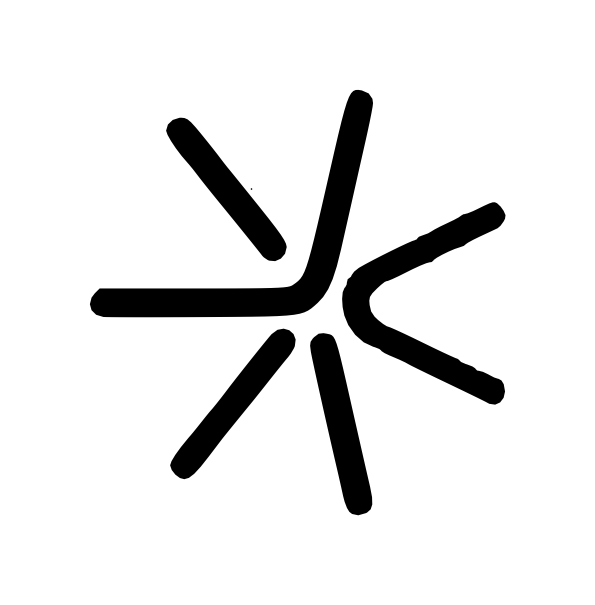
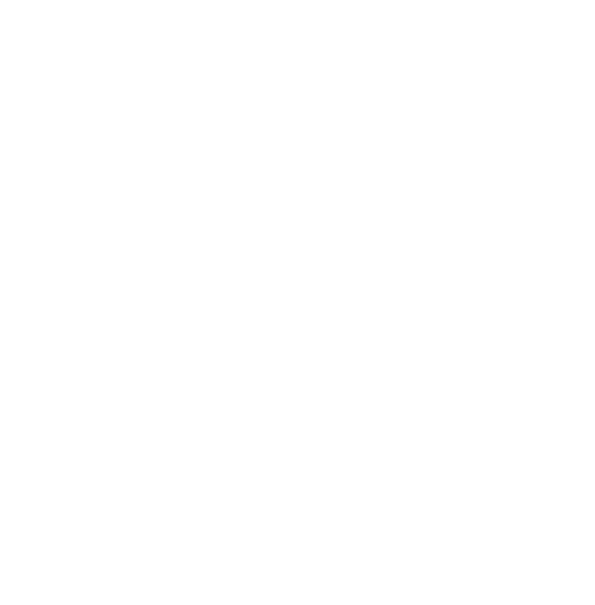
drawing: [89, 89, 506, 516] -> none

